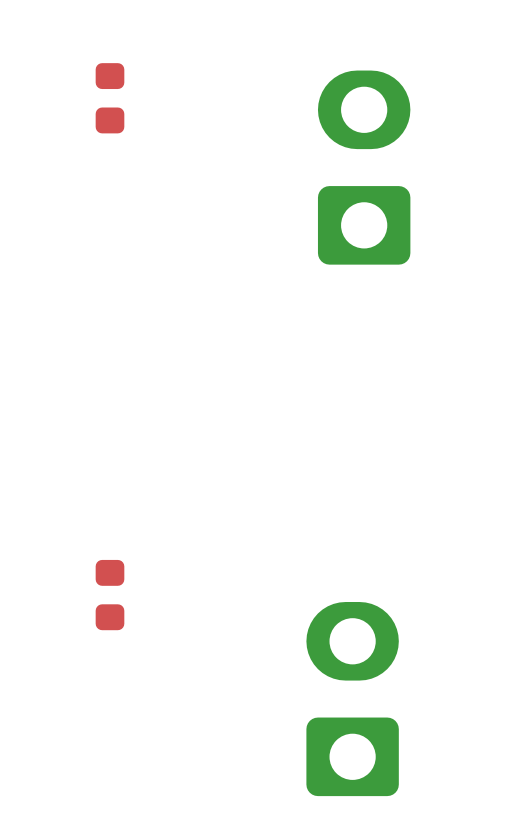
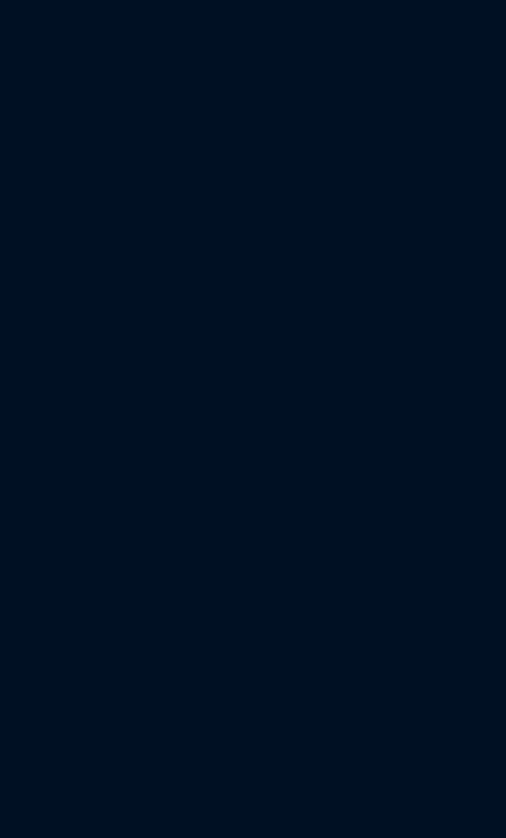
part: (109, 98) -> none
part: (364, 167) -> none
part: (109, 595) -> none
part: (352, 699) -> none

